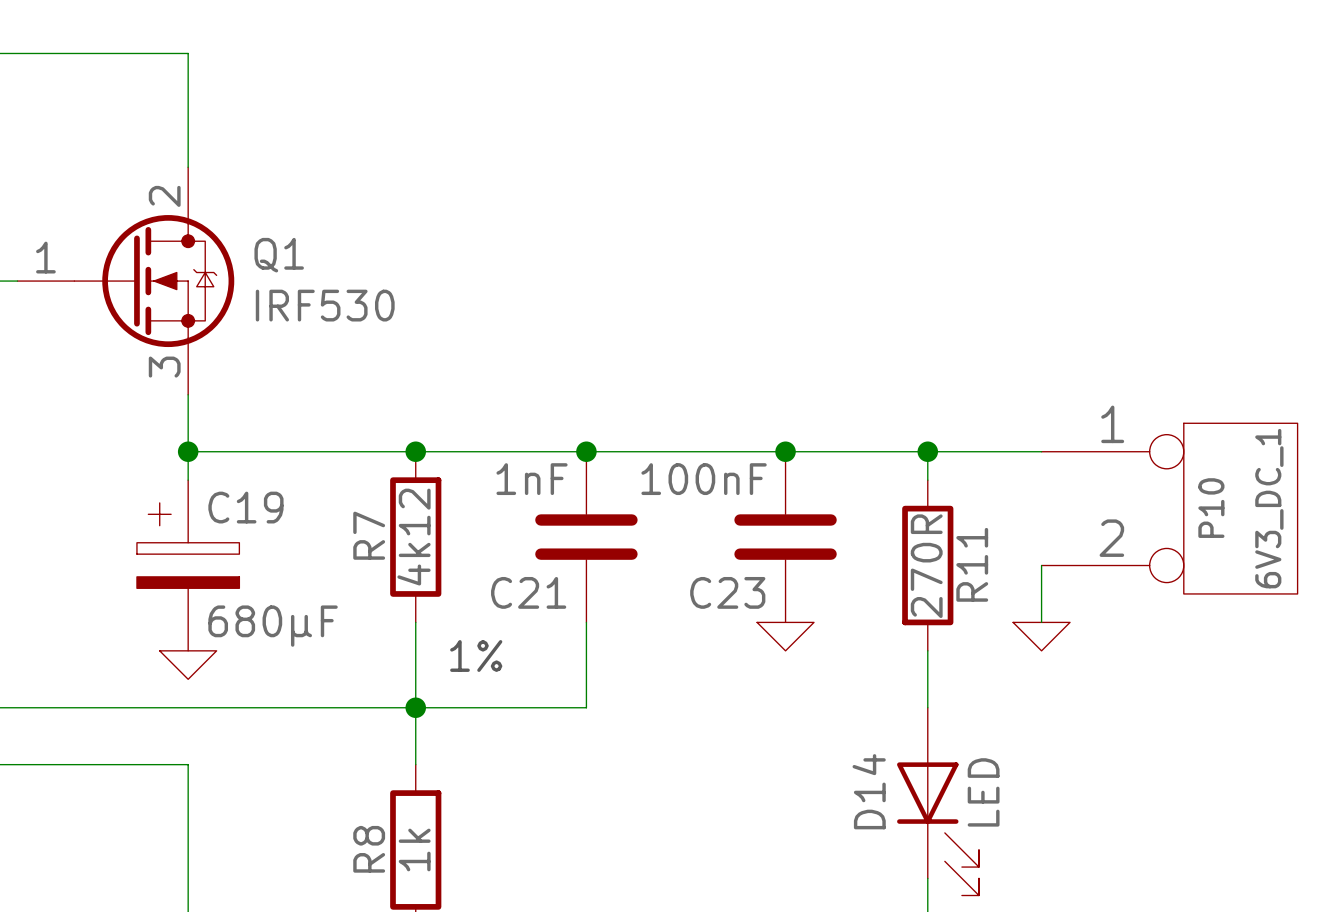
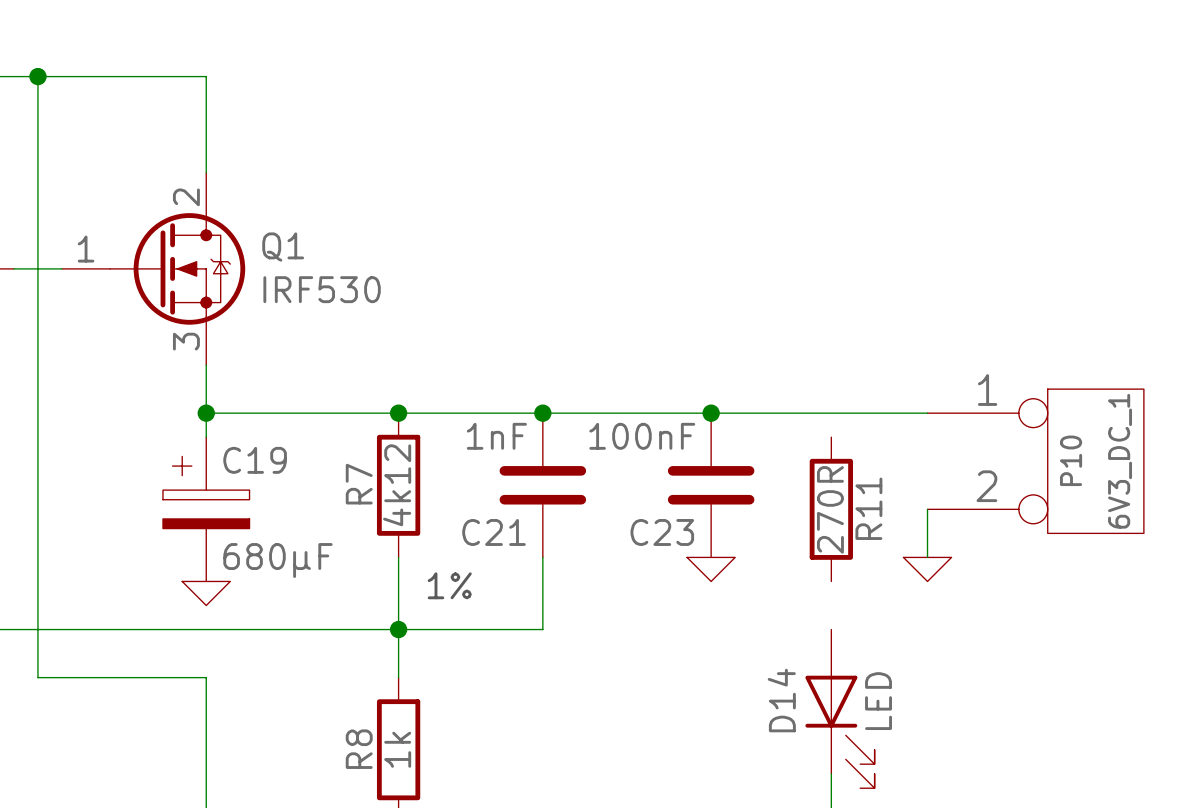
wire: (927, 451) (927, 480) -> none
junction: (927, 451) -> none
wire: (927, 650) (927, 707) -> none

